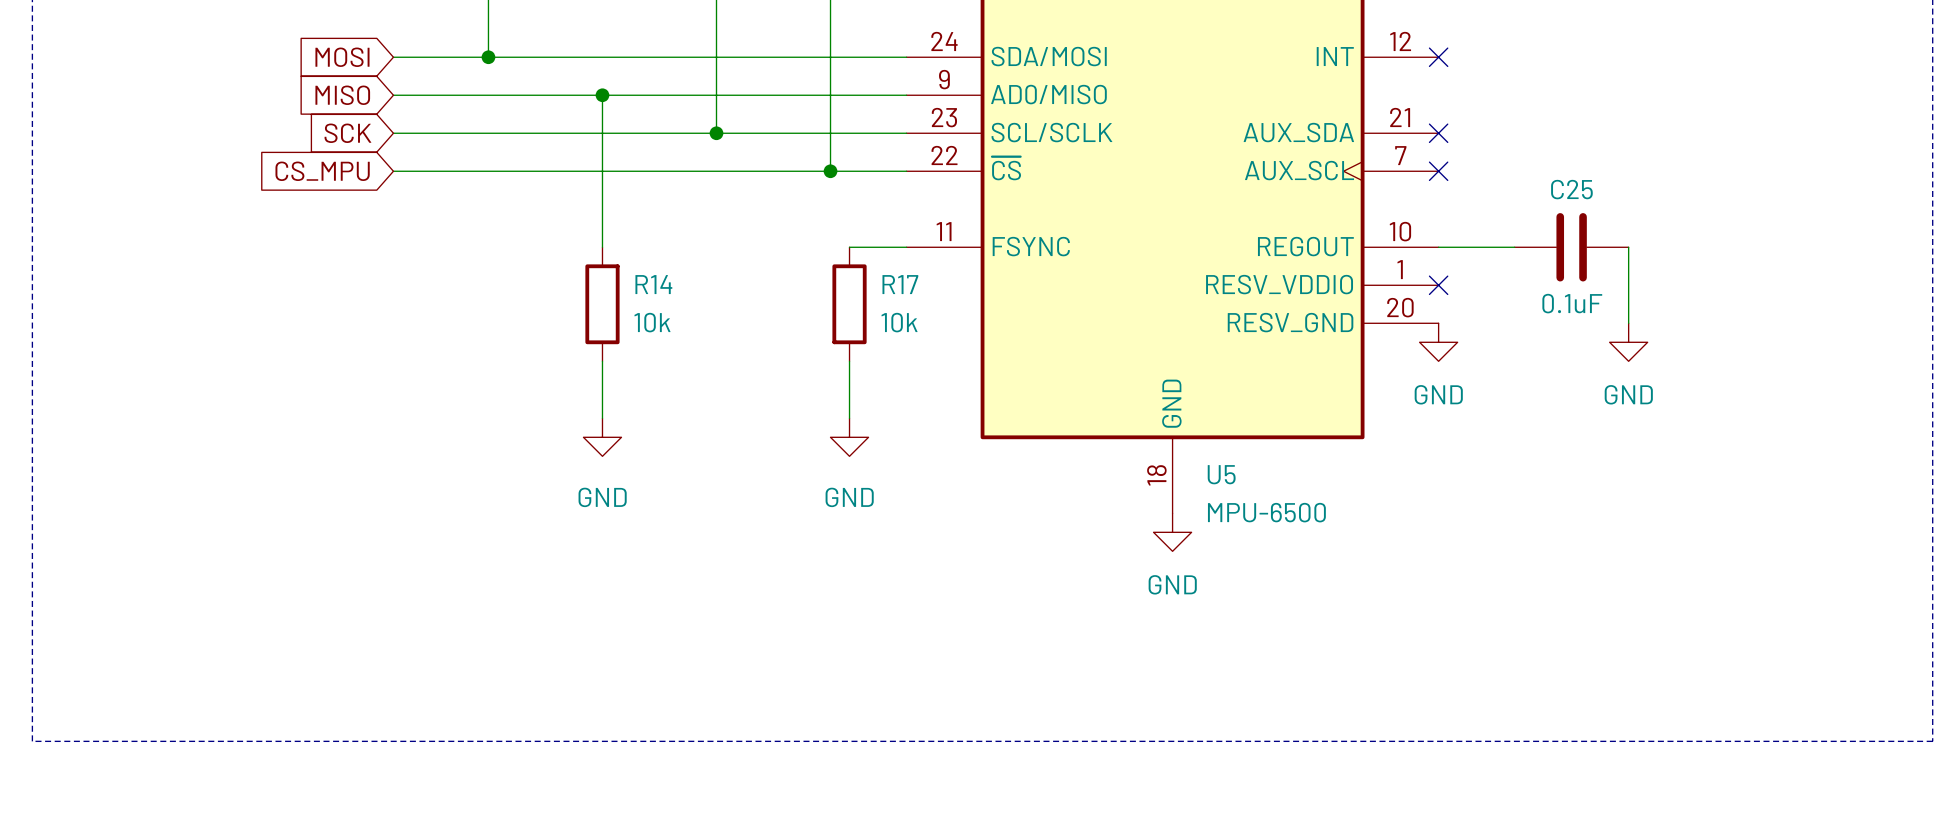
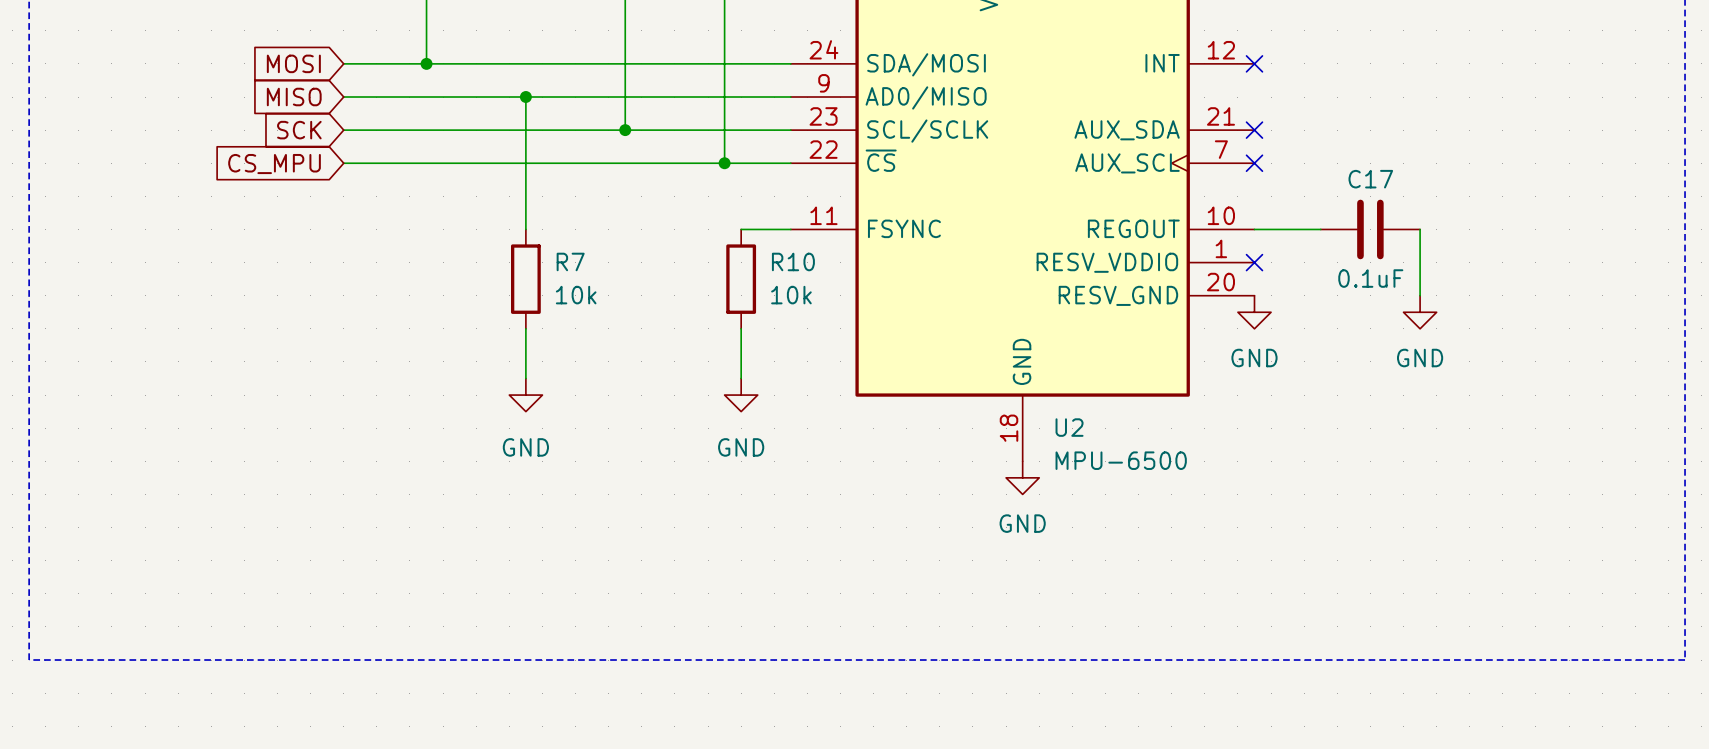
C25 name: C25 (1571, 189) -> C17 (1370, 179)
R14 name: R14 (653, 284) -> R7 (570, 261)
R17 name: R17 (900, 284) -> R10 (793, 261)
U5 name: U5 (1221, 474) -> U2 (1069, 427)

